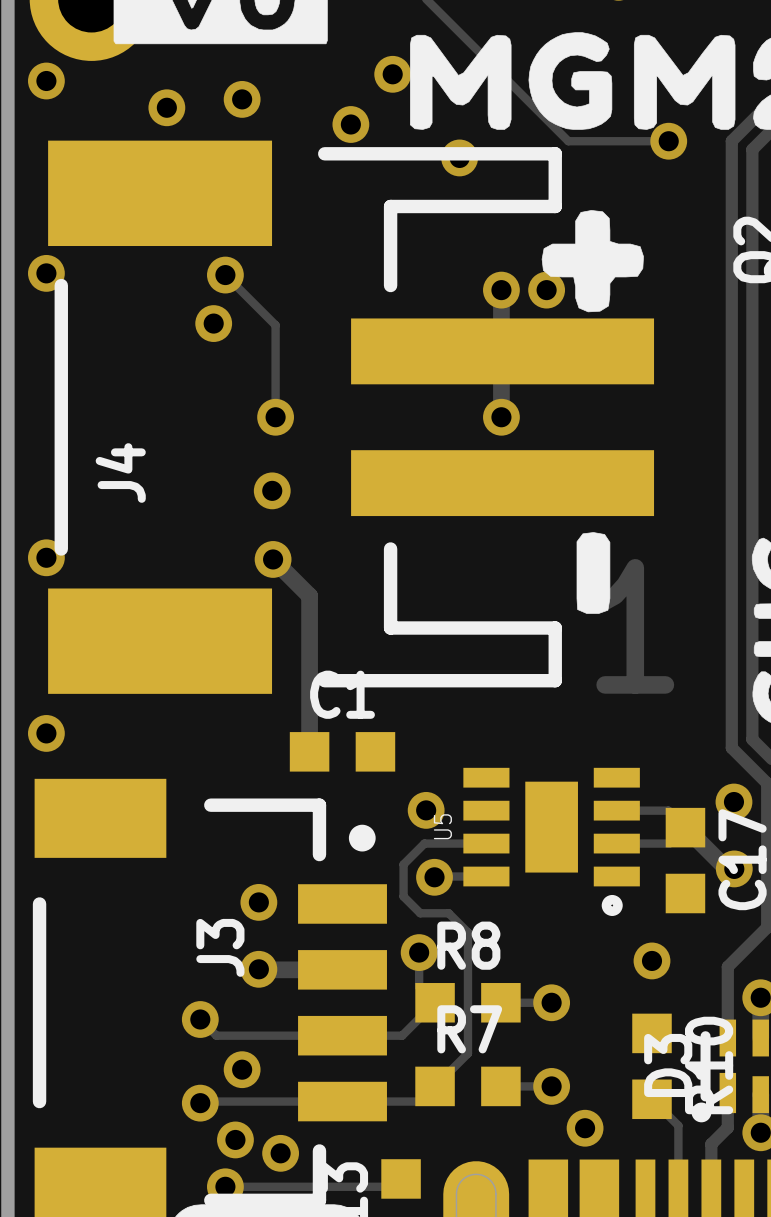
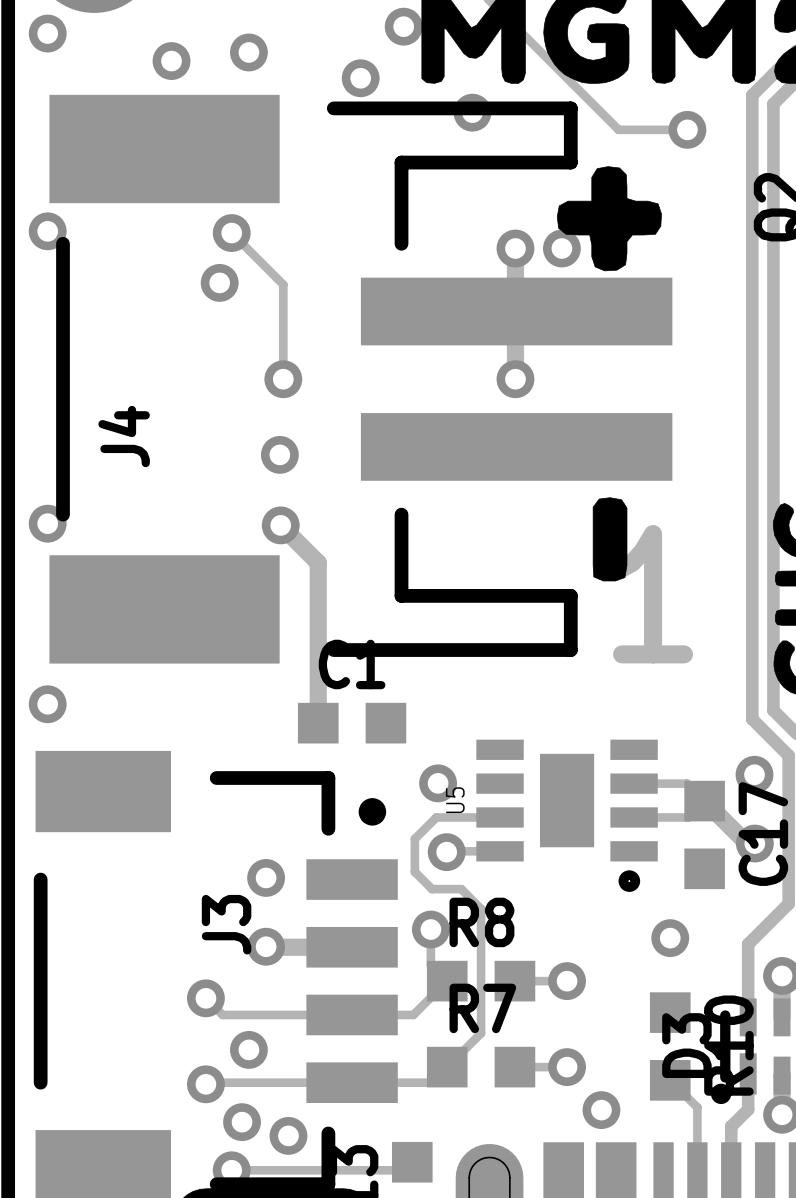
track: (568, 141) (668, 141) -> (584, 95) (618, 129) (687, 129)
via position: (668, 141) -> (687, 129)

